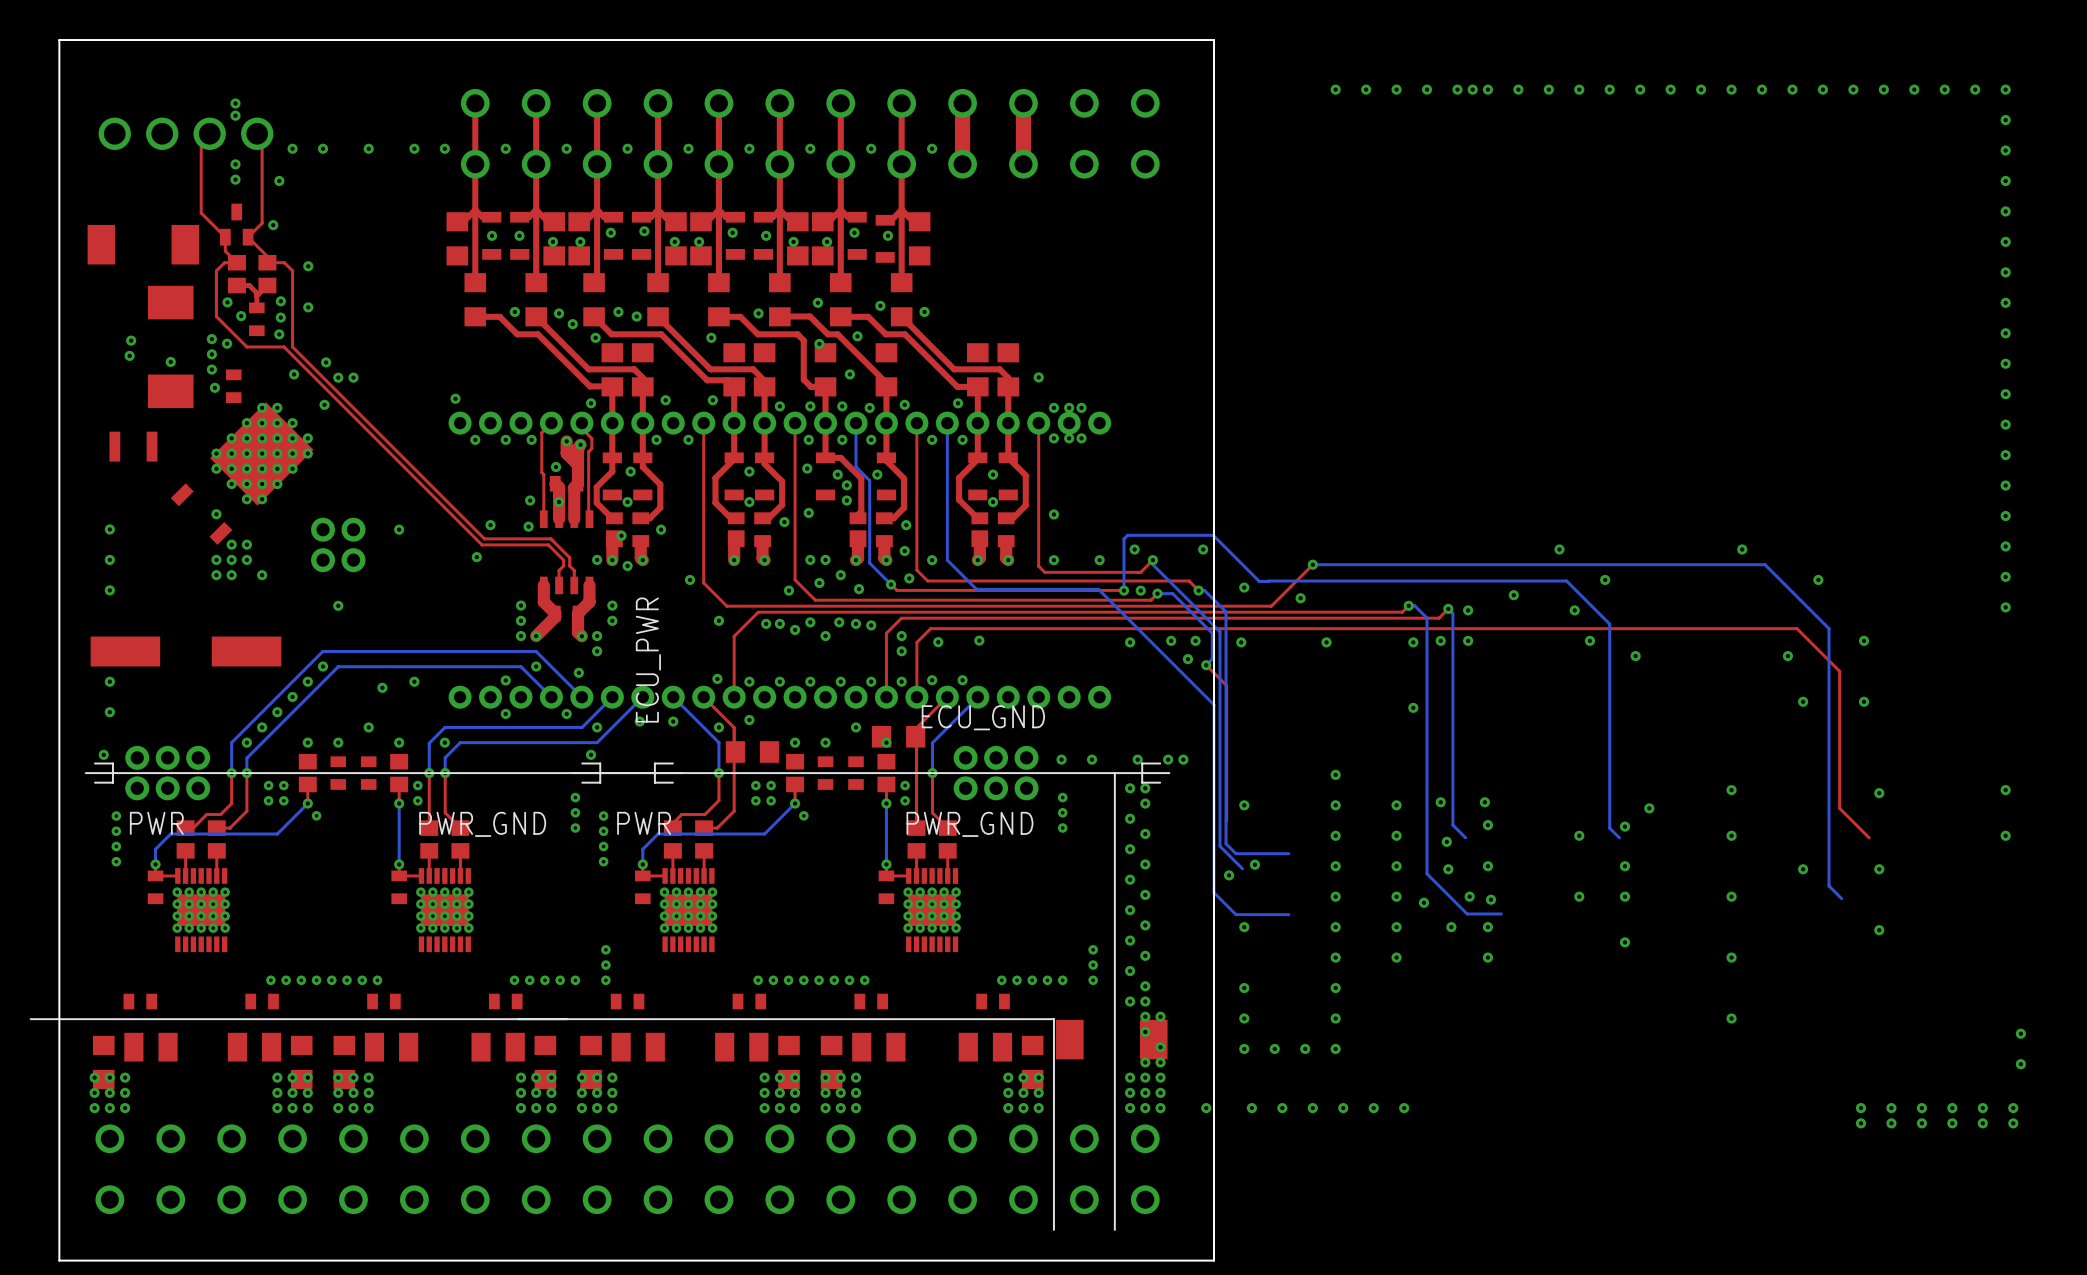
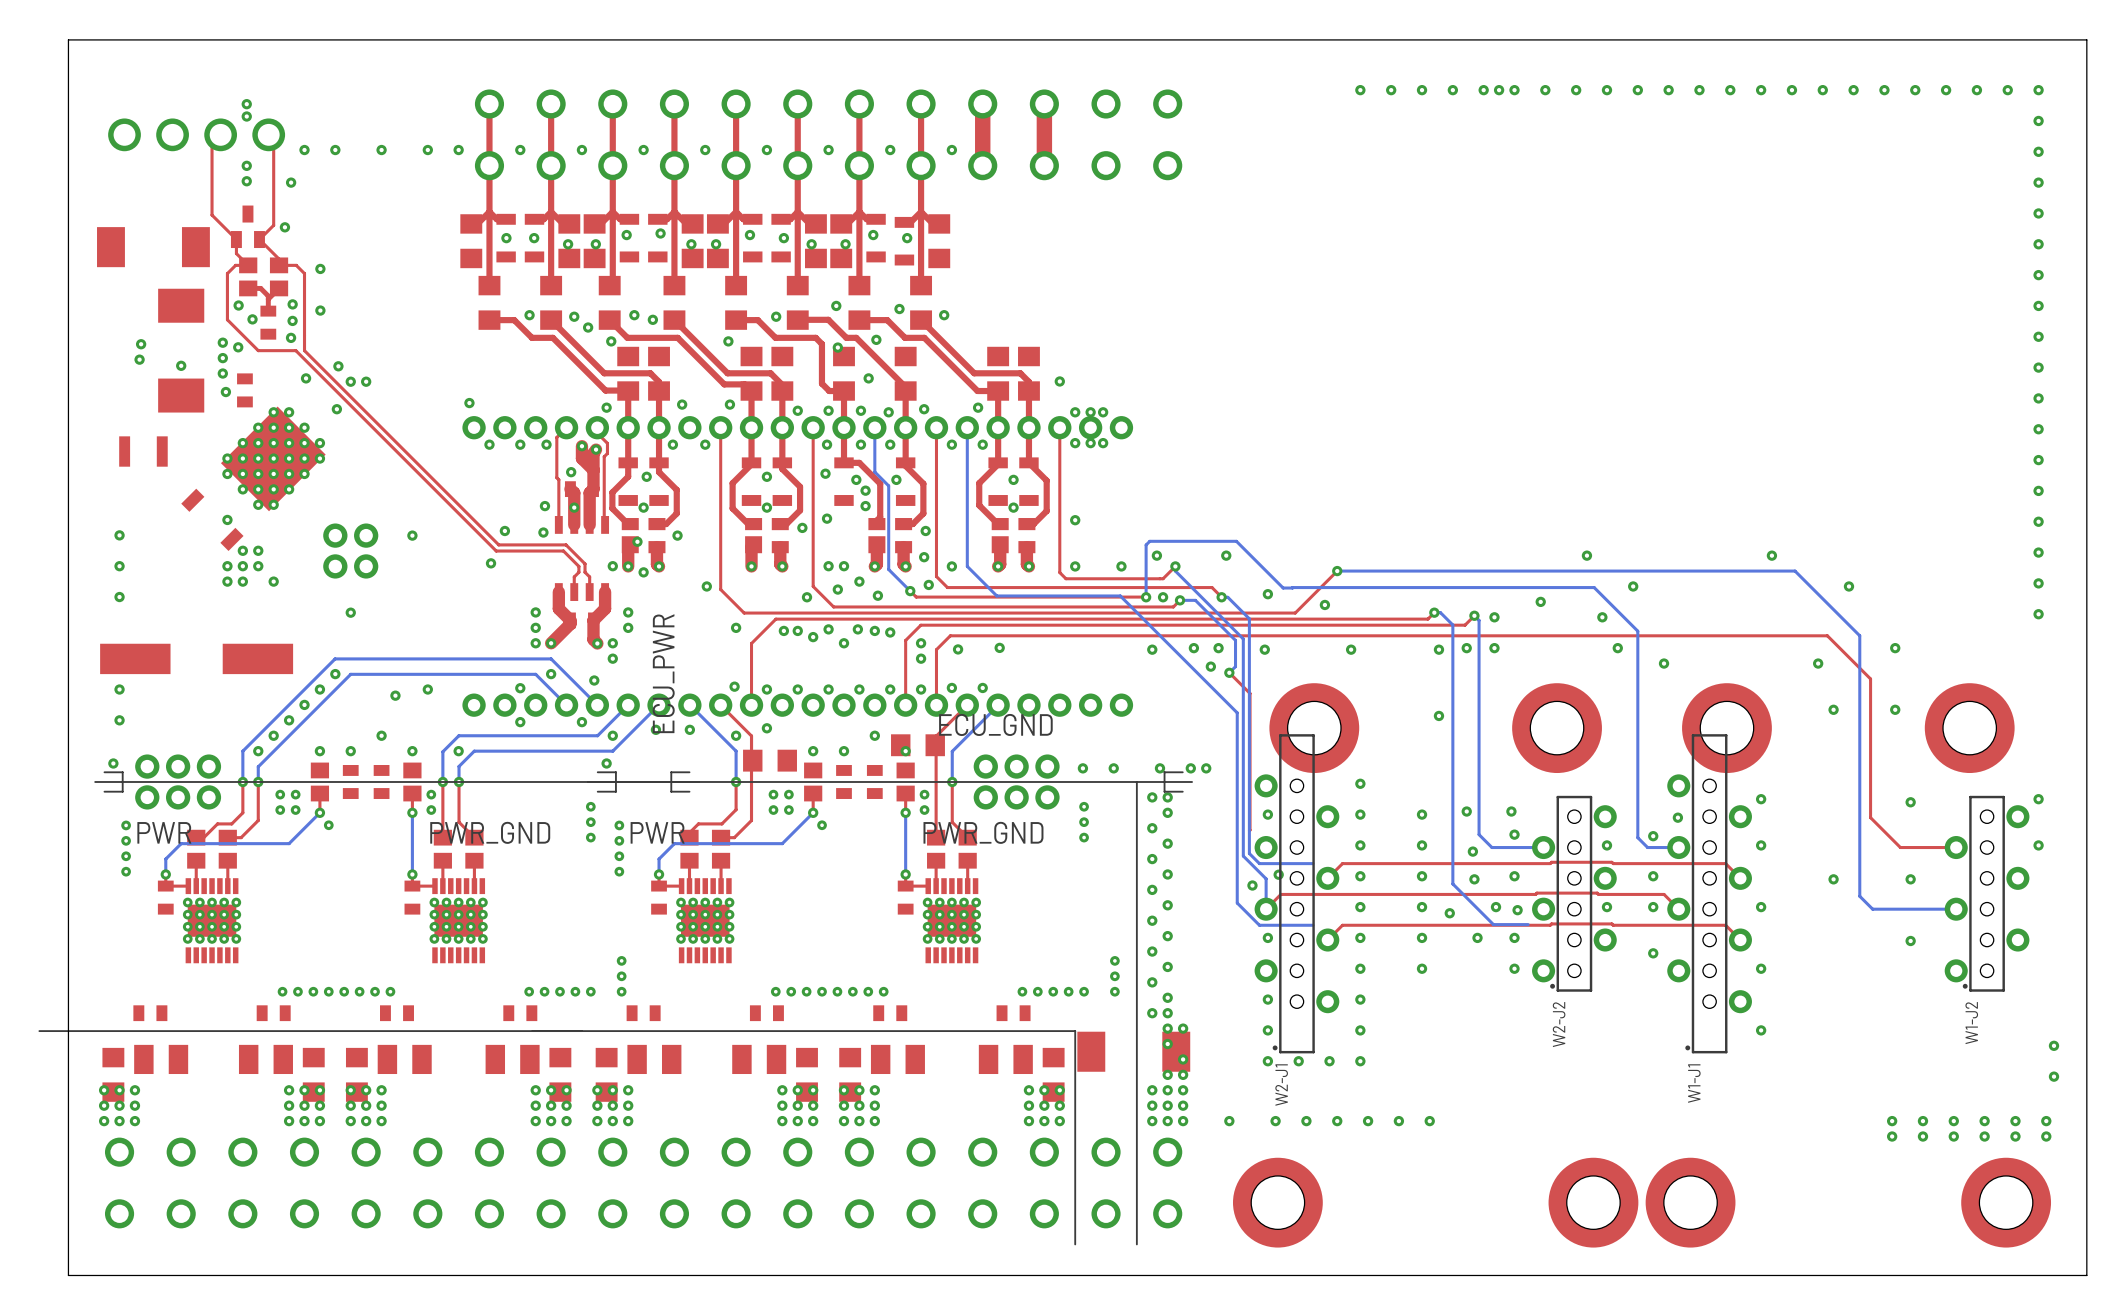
board edge: (1214, 40) (1214, 1260) -> (1237, 39) (2086, 39) (2086, 1275) (1237, 1275)
part: none -> (1314, 728)
part: none -> (1557, 728)
part: none -> (1726, 728)
part: none -> (1969, 728)
bottom track: none -> (1543, 847) (1491, 847)
bottom track: none -> (1678, 847) (1647, 847)
top track: none -> (1956, 847) (1900, 847)
bottom track: none -> (1266, 878) (1266, 909)
top track: none -> (1740, 878) (1725, 863) (1611, 862) (1342, 863) (1327, 878)
W2-J1: none -> (1296, 893)
W2-J2: none -> (1574, 893)
W1-J1: none -> (1709, 893)
W1-J2: none -> (1987, 893)
top track: none -> (1678, 909) (1664, 894) (1597, 893) (1280, 894) (1266, 909)
bottom track: none -> (1956, 909) (1872, 909)
top track: none -> (1740, 940) (1725, 925) (1611, 923) (1342, 925) (1327, 940)
part: none -> (1277, 1202)
part: none -> (1593, 1202)
part: none -> (1690, 1202)
part: none -> (2006, 1202)

